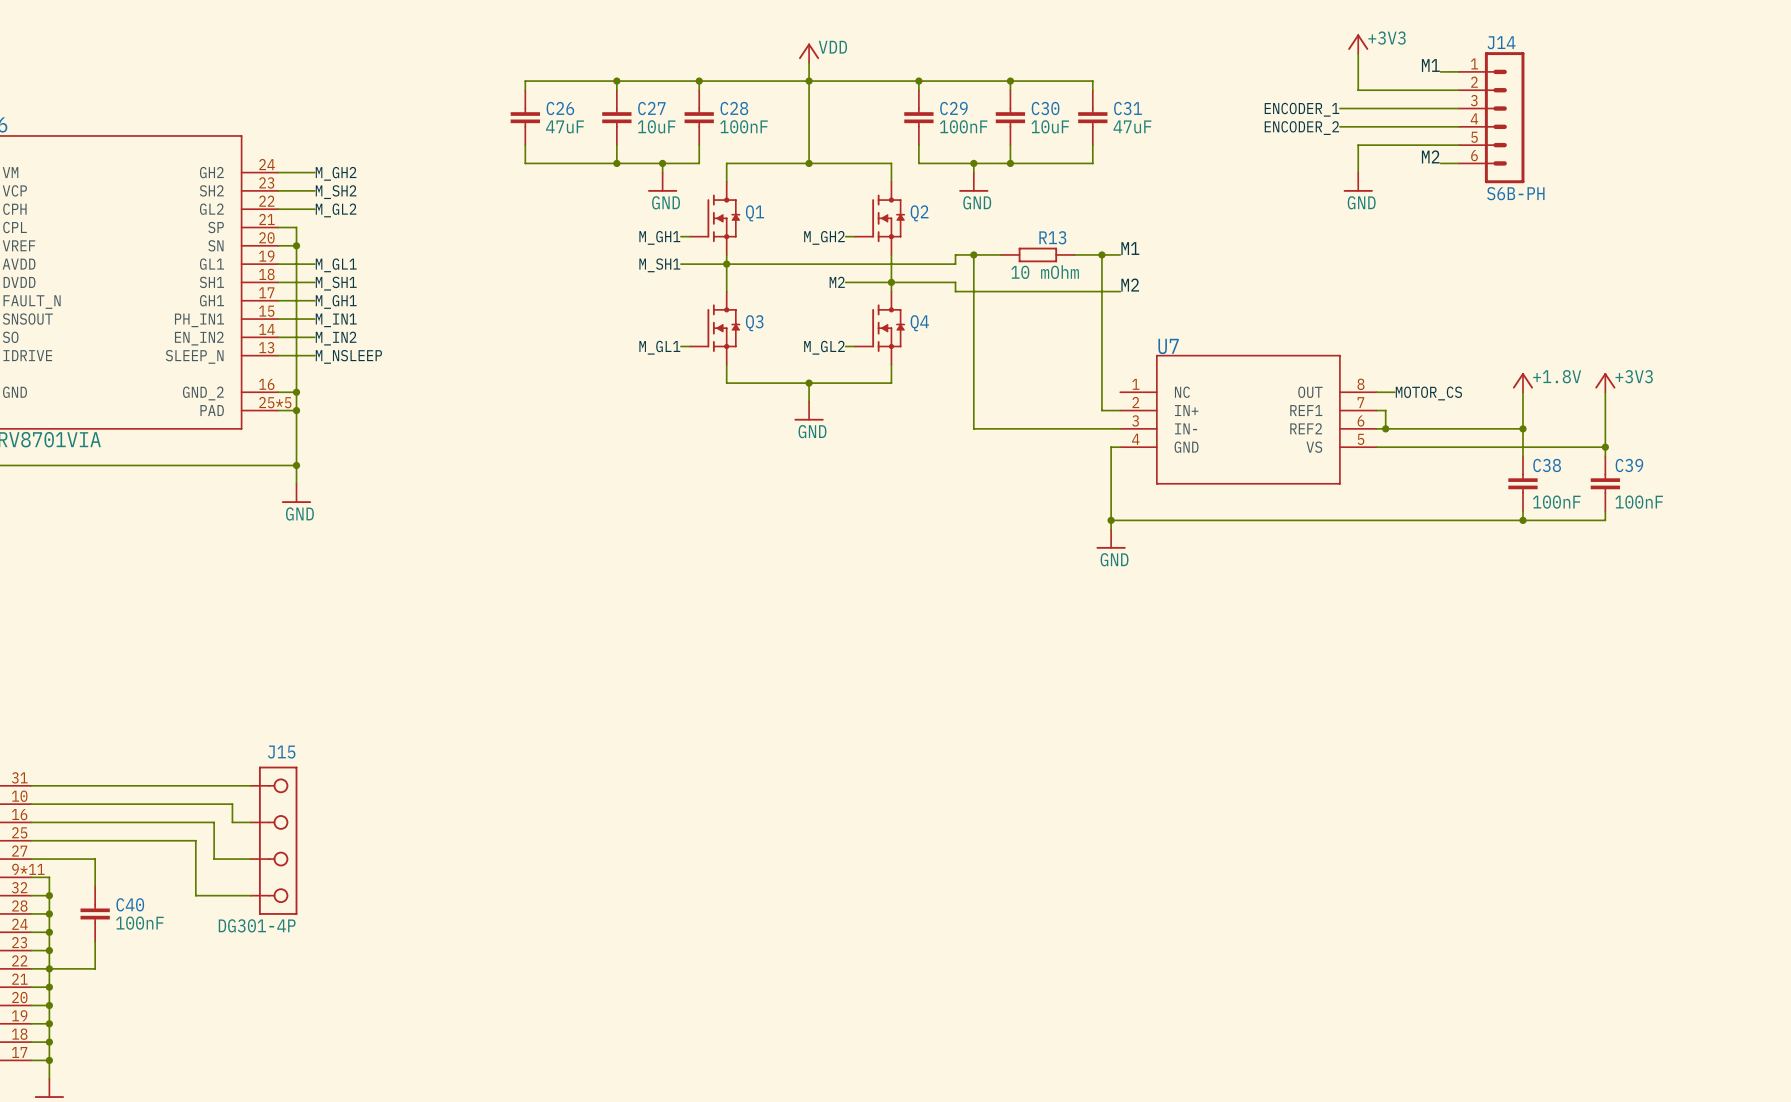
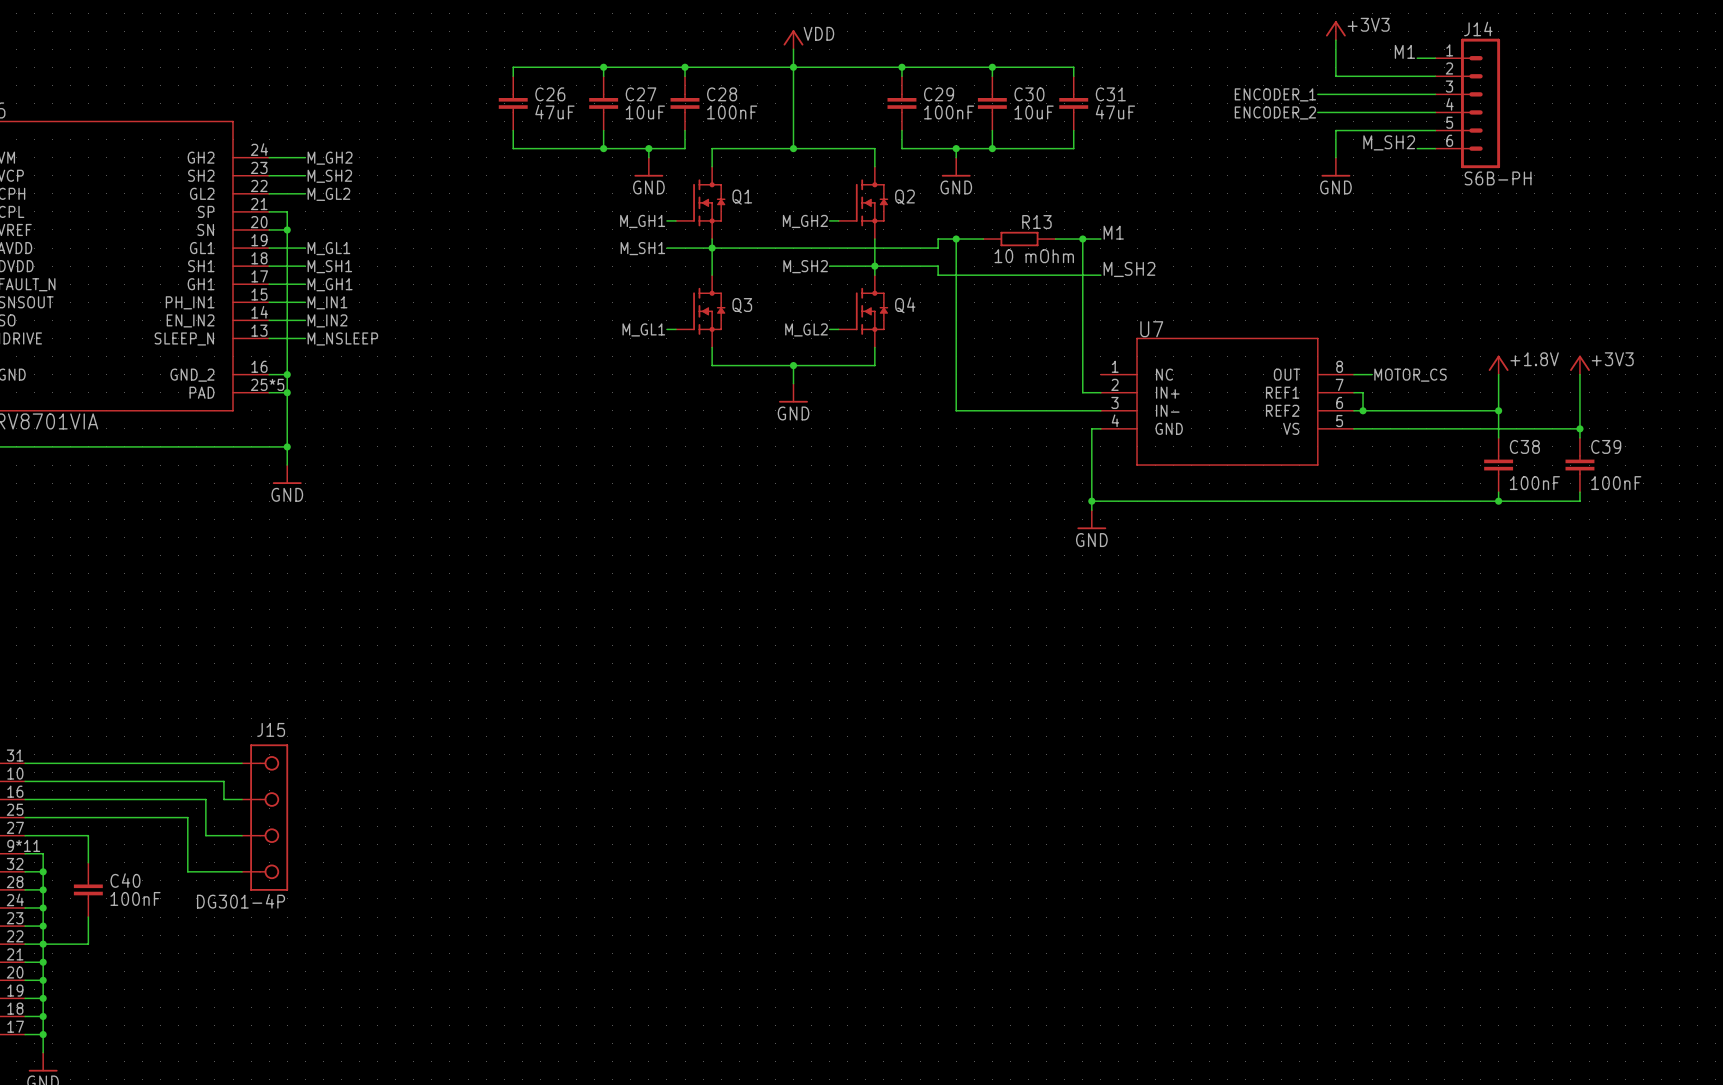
label: M2 (1430, 156) -> M_SH2 (1389, 142)
label: M2 (837, 282) -> M_SH2 (805, 266)
label: M2 (1130, 285) -> M_SH2 (1129, 269)

